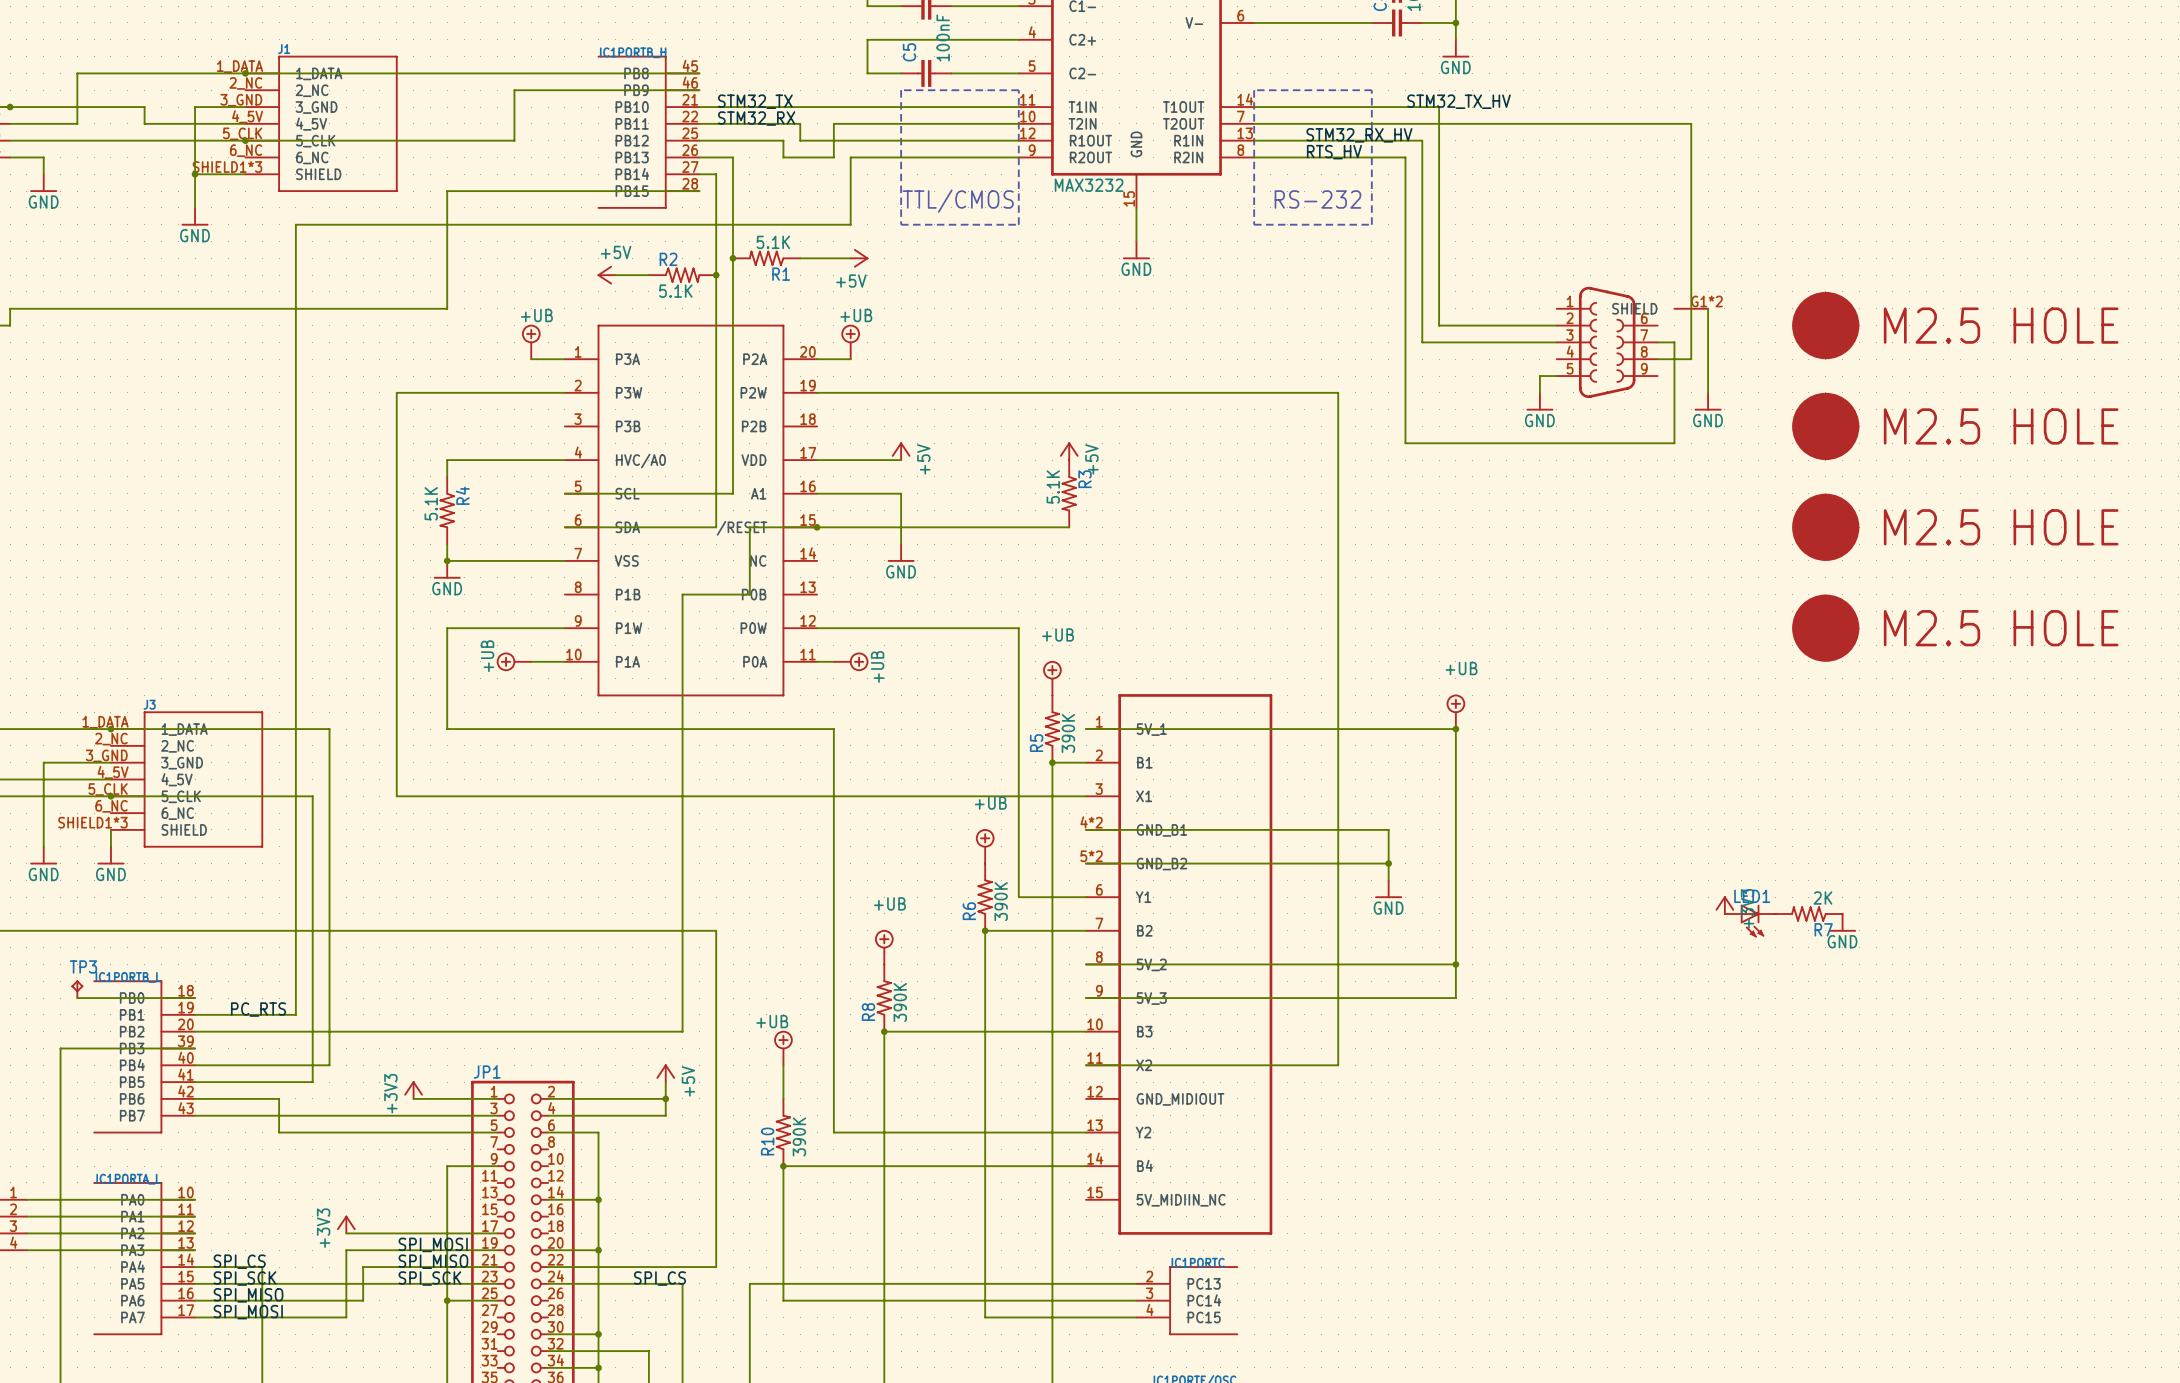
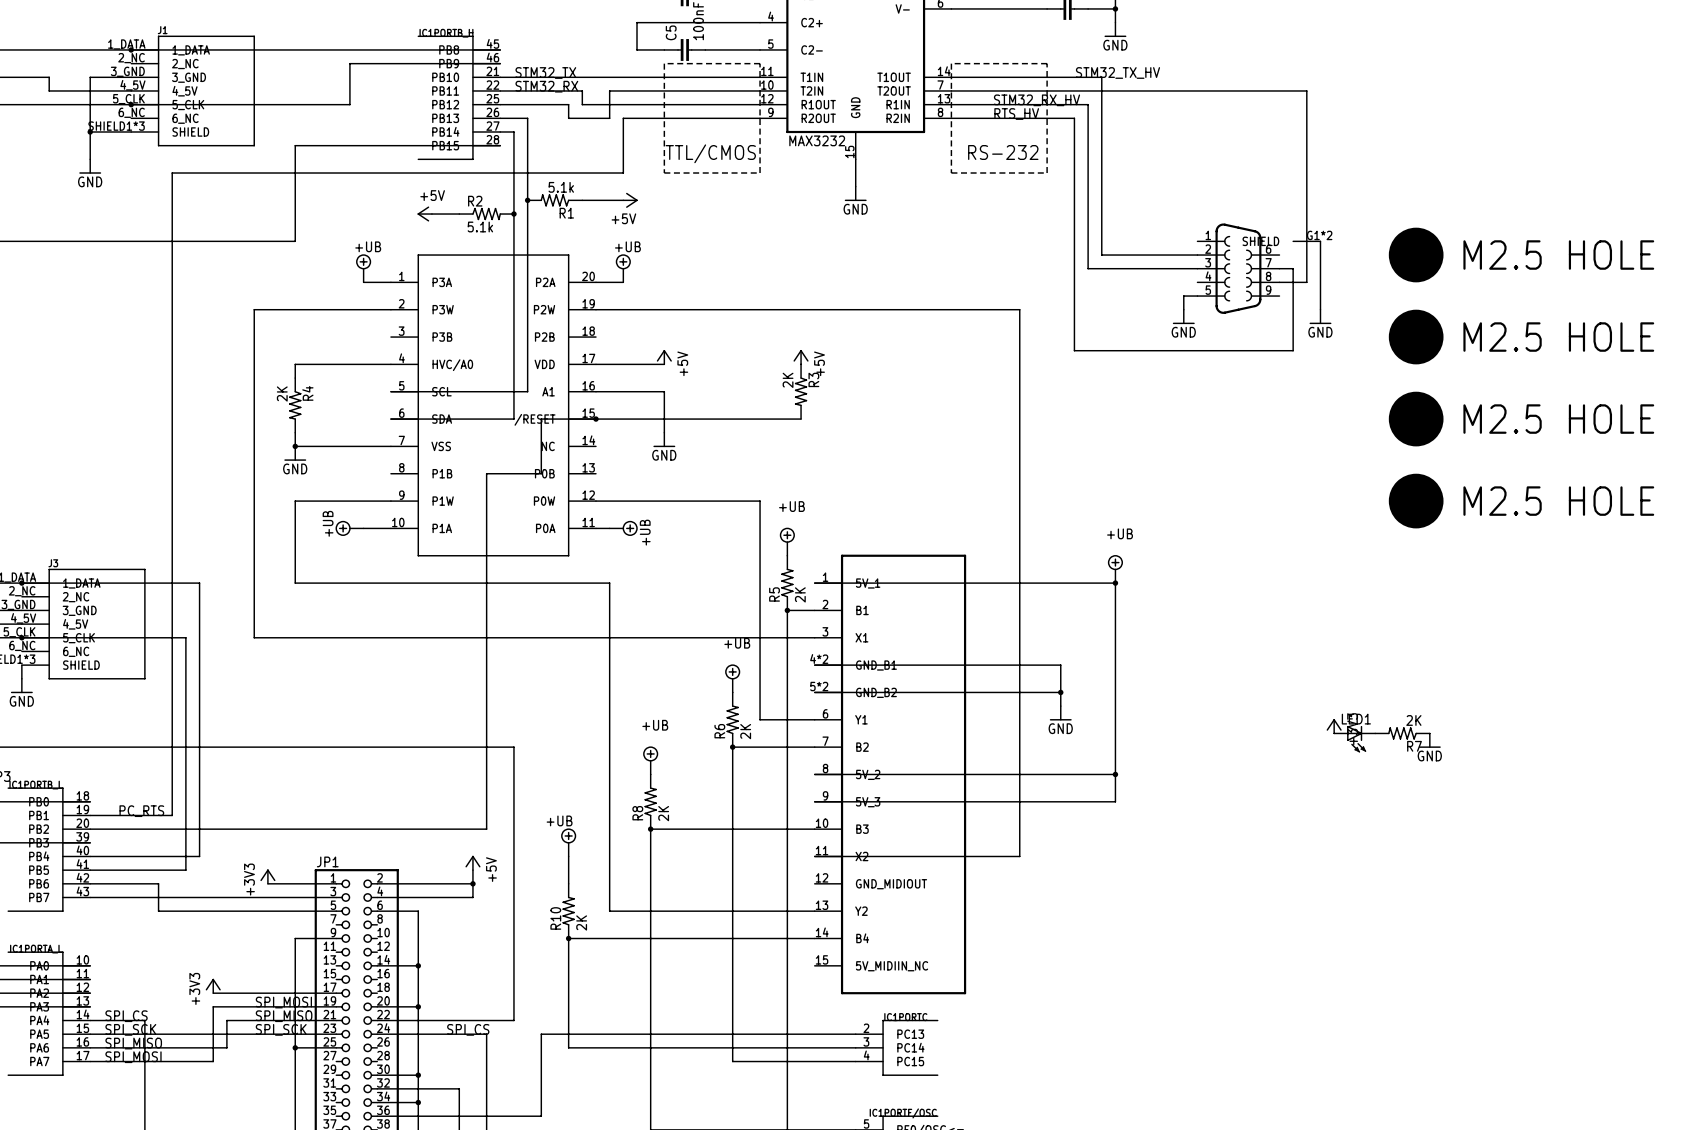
R1 value: 5.1K (773, 242) -> 5.1k (561, 187)
R2 value: 5.1K (675, 291) -> 5.1k (480, 227)
R3 value: 5.1K (1053, 487) -> 2K (788, 380)
R4 value: 5.1K (431, 503) -> 2K (282, 394)
R5 value: 390K (1068, 733) -> 2K (800, 594)
R6 value: 390K (1001, 901) -> 2K (745, 731)
R8 value: 390K (900, 1002) -> 2K (663, 813)
R10 value: 390K (799, 1136) -> 2K (581, 922)

